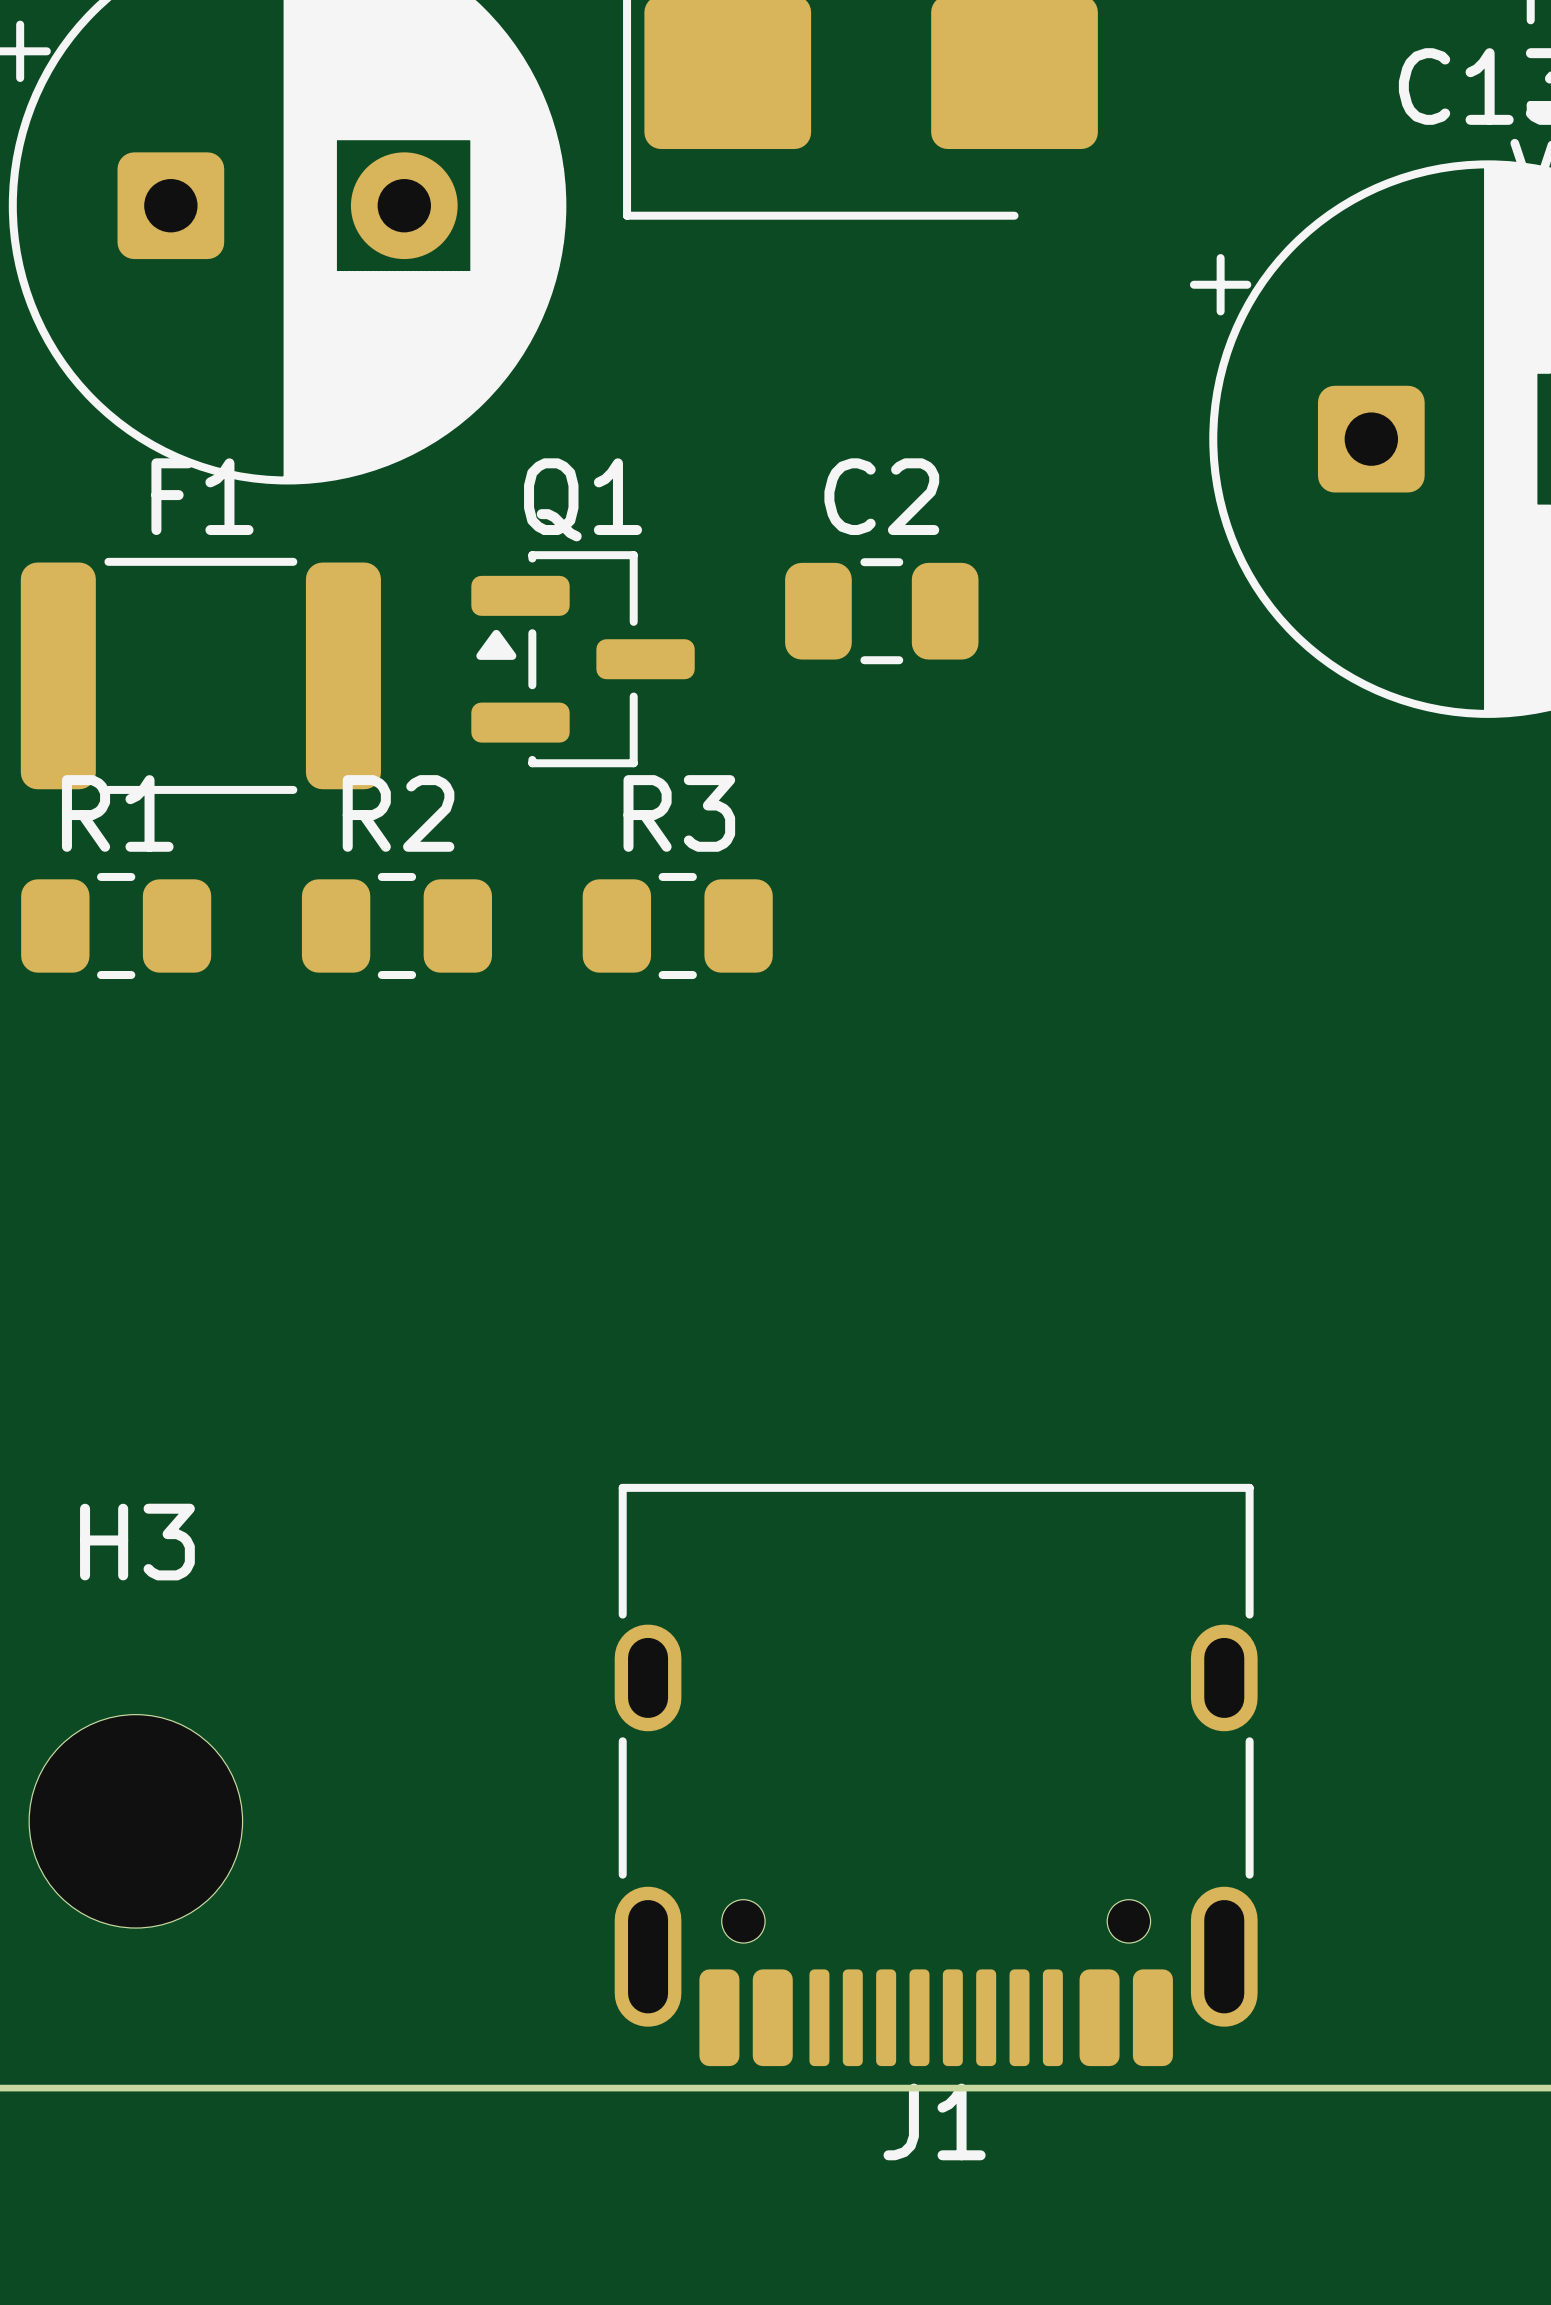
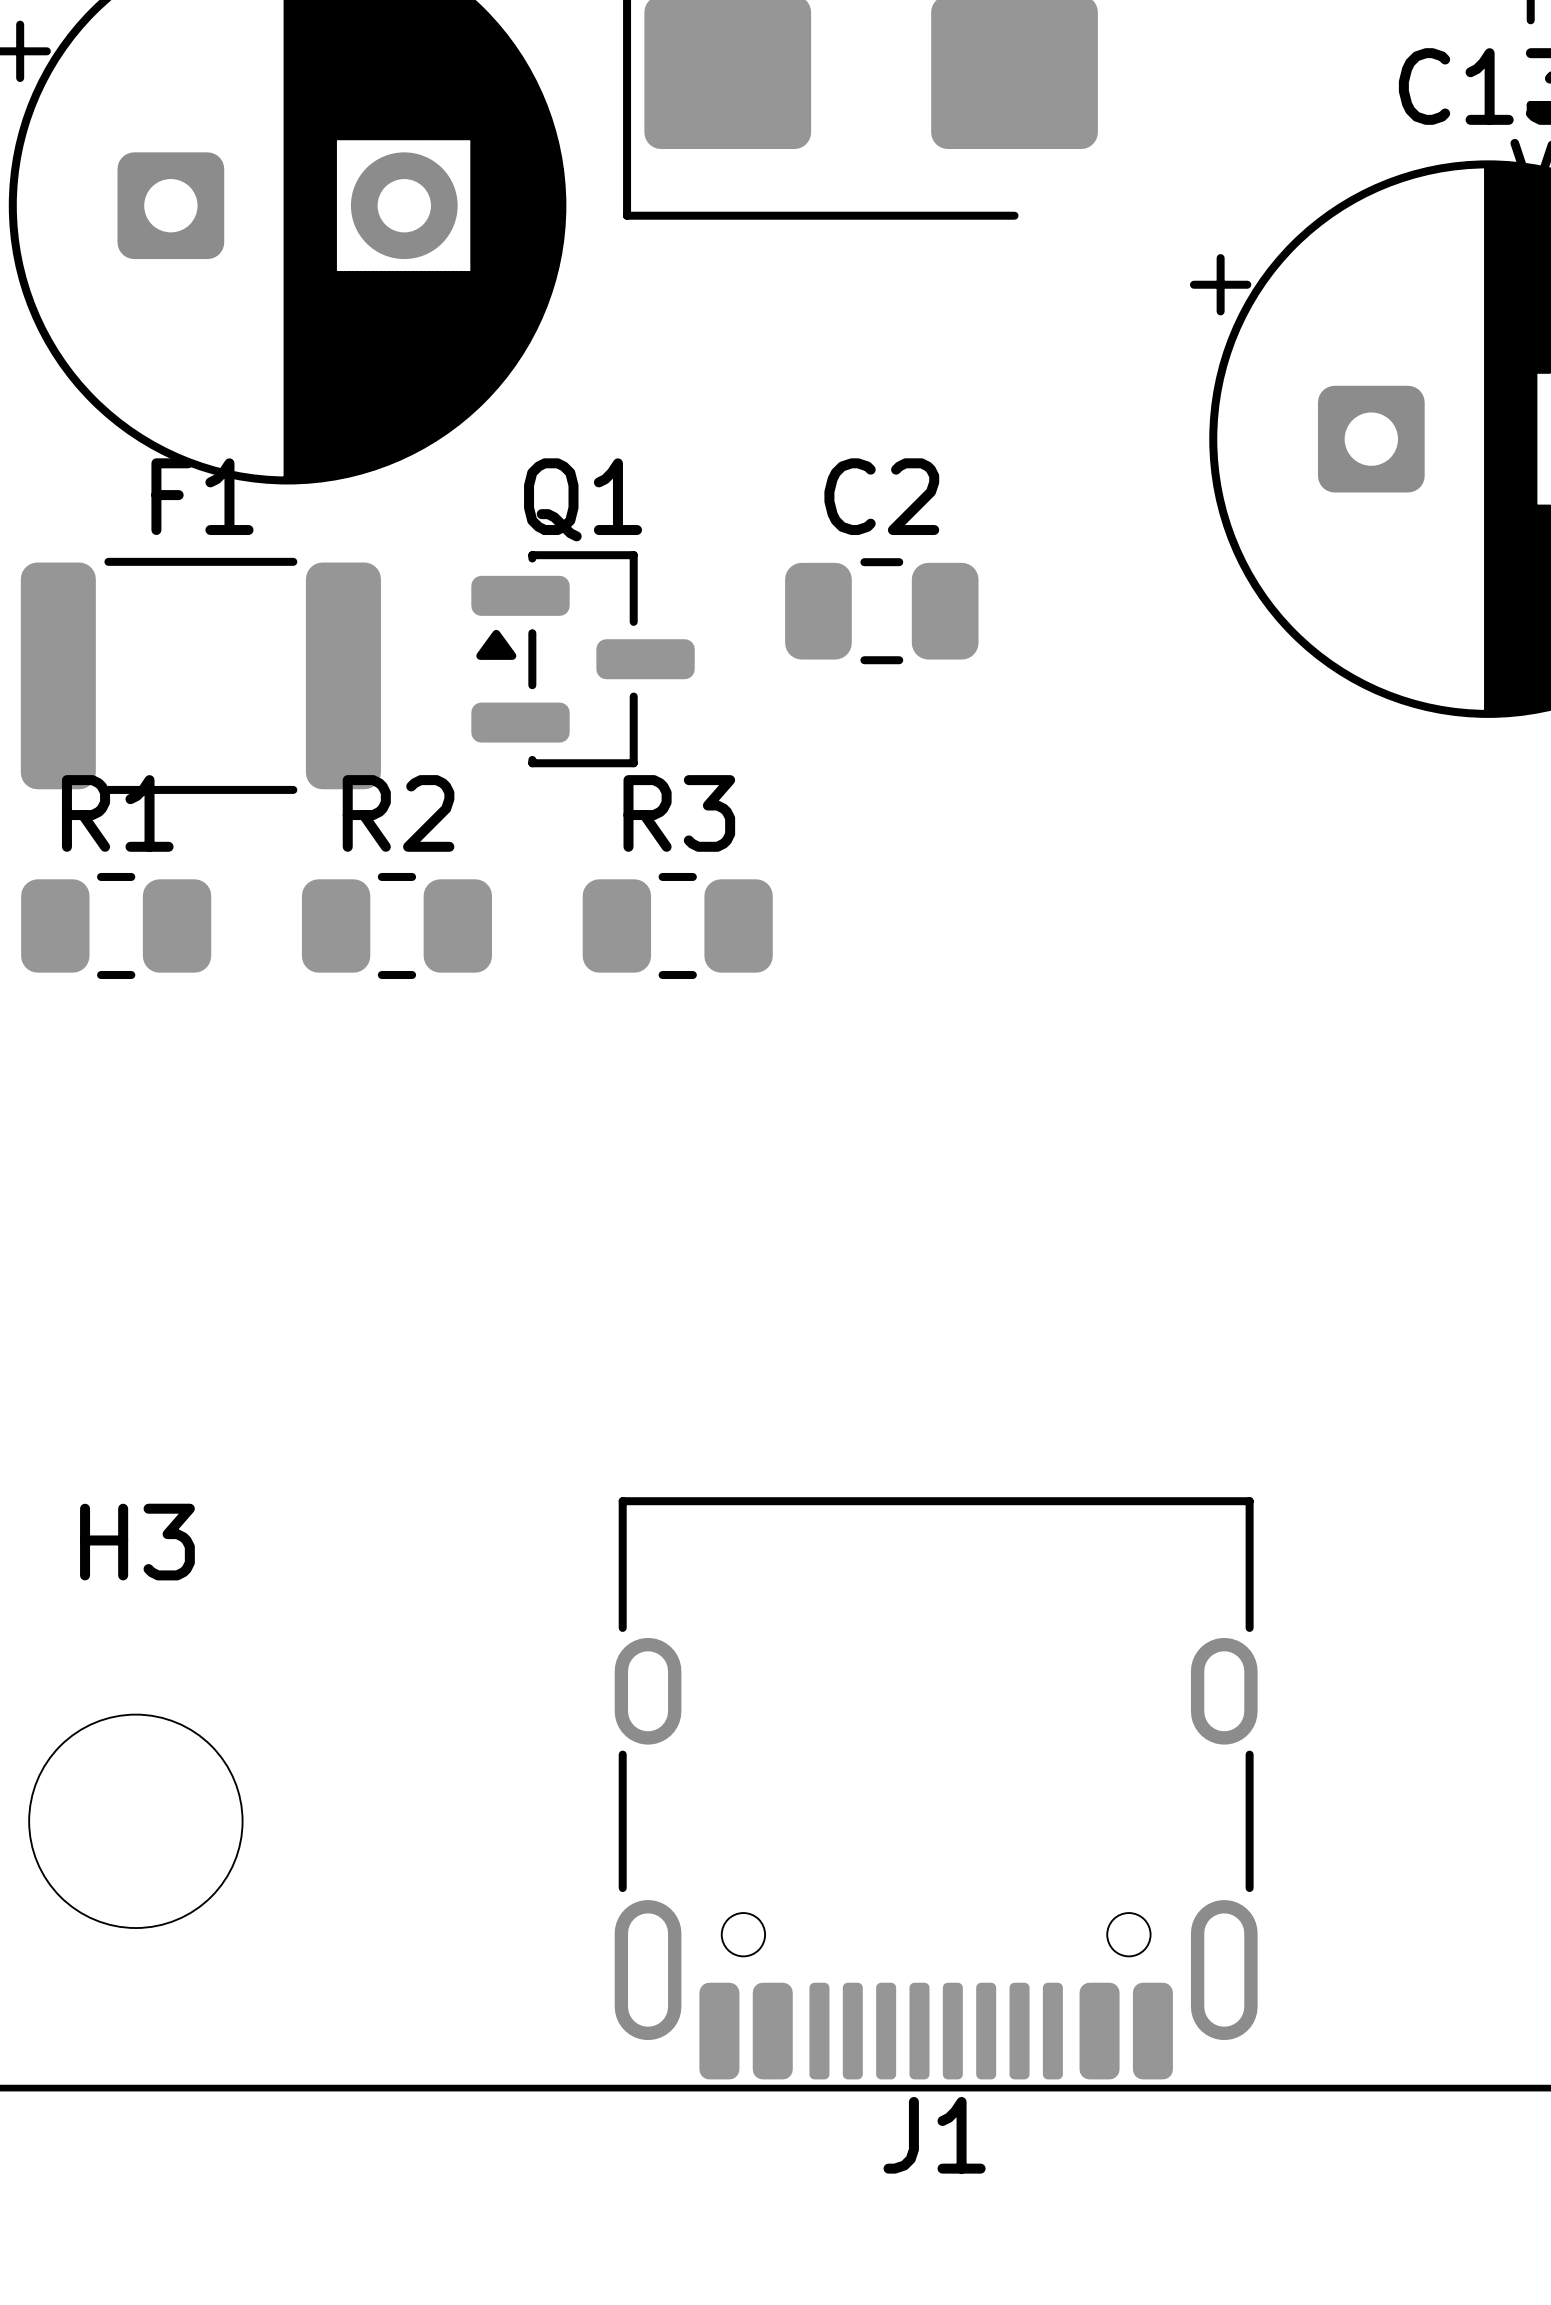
J1 position: (936, 1774) -> (936, 1788)

